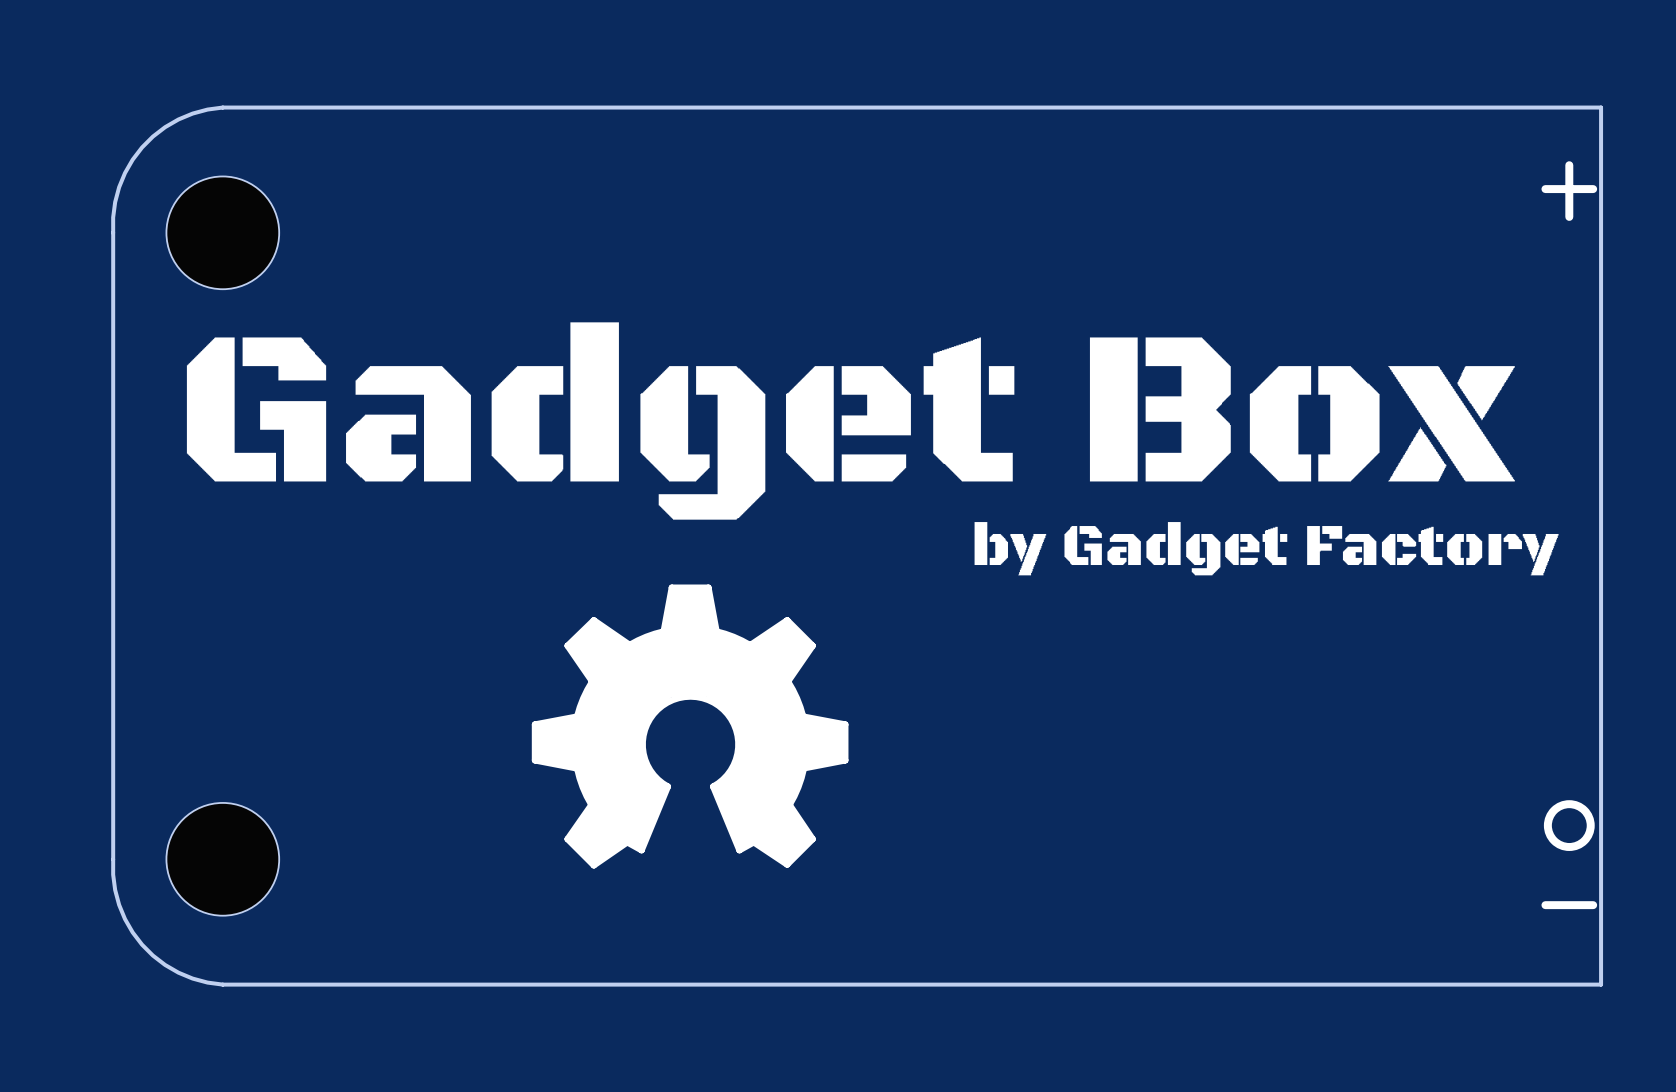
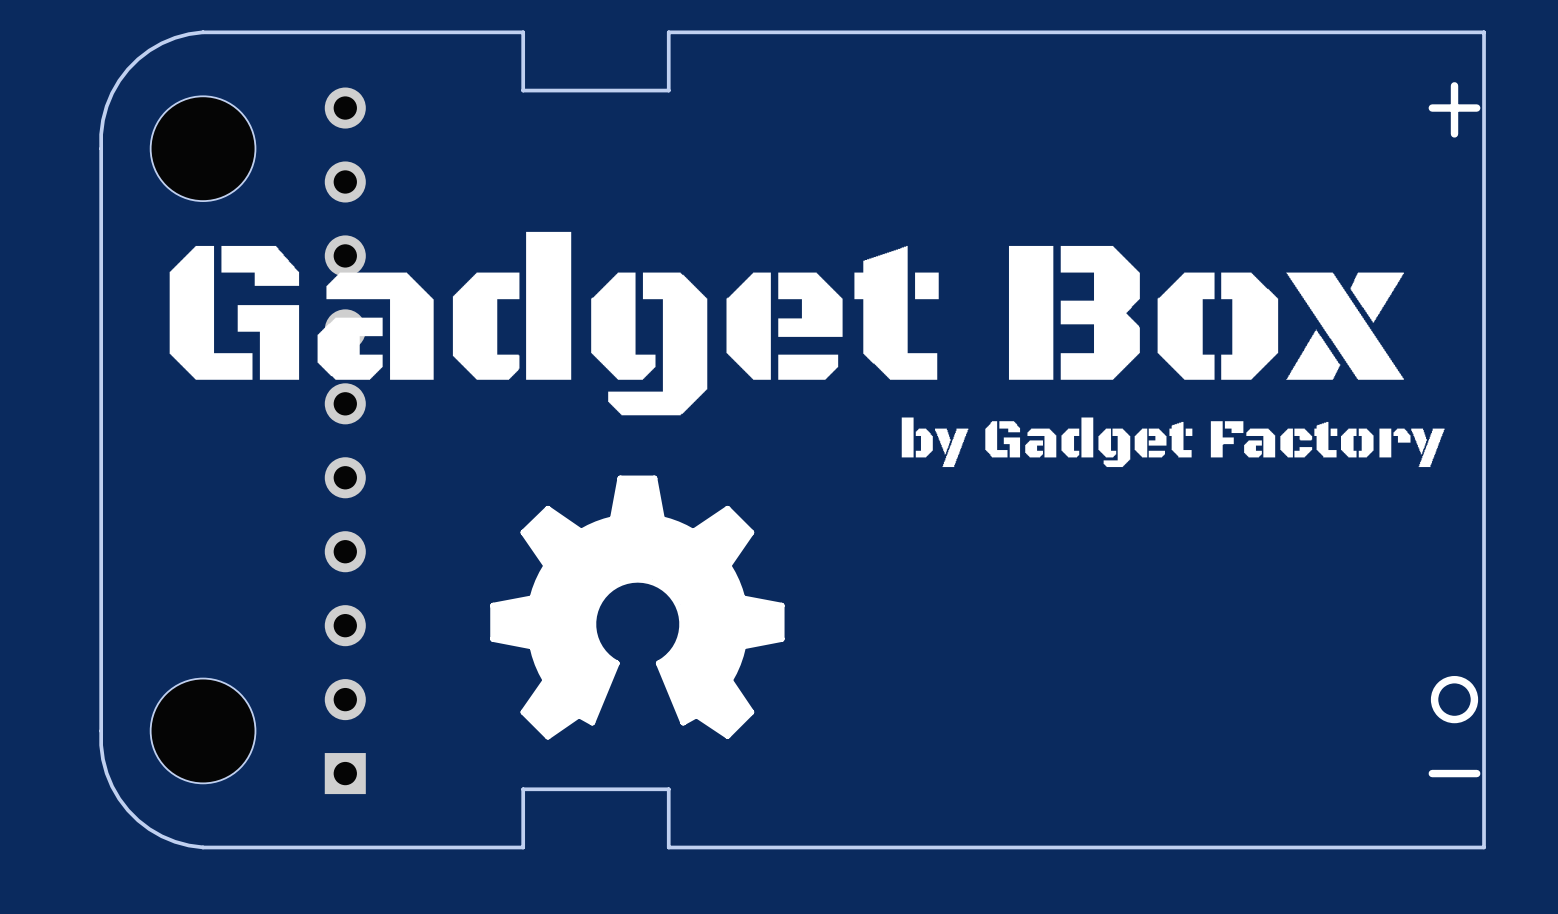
part footprint: [111, 105, 1604, 987] -> [99, 30, 1486, 850]

